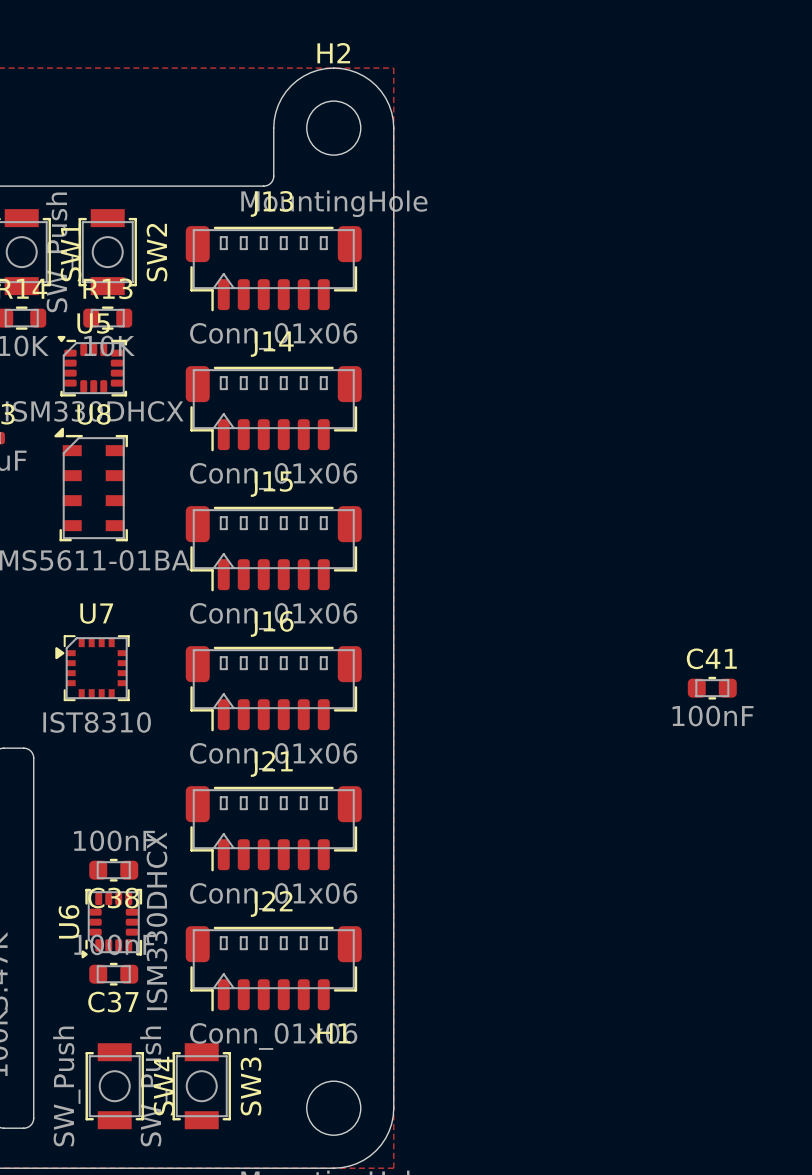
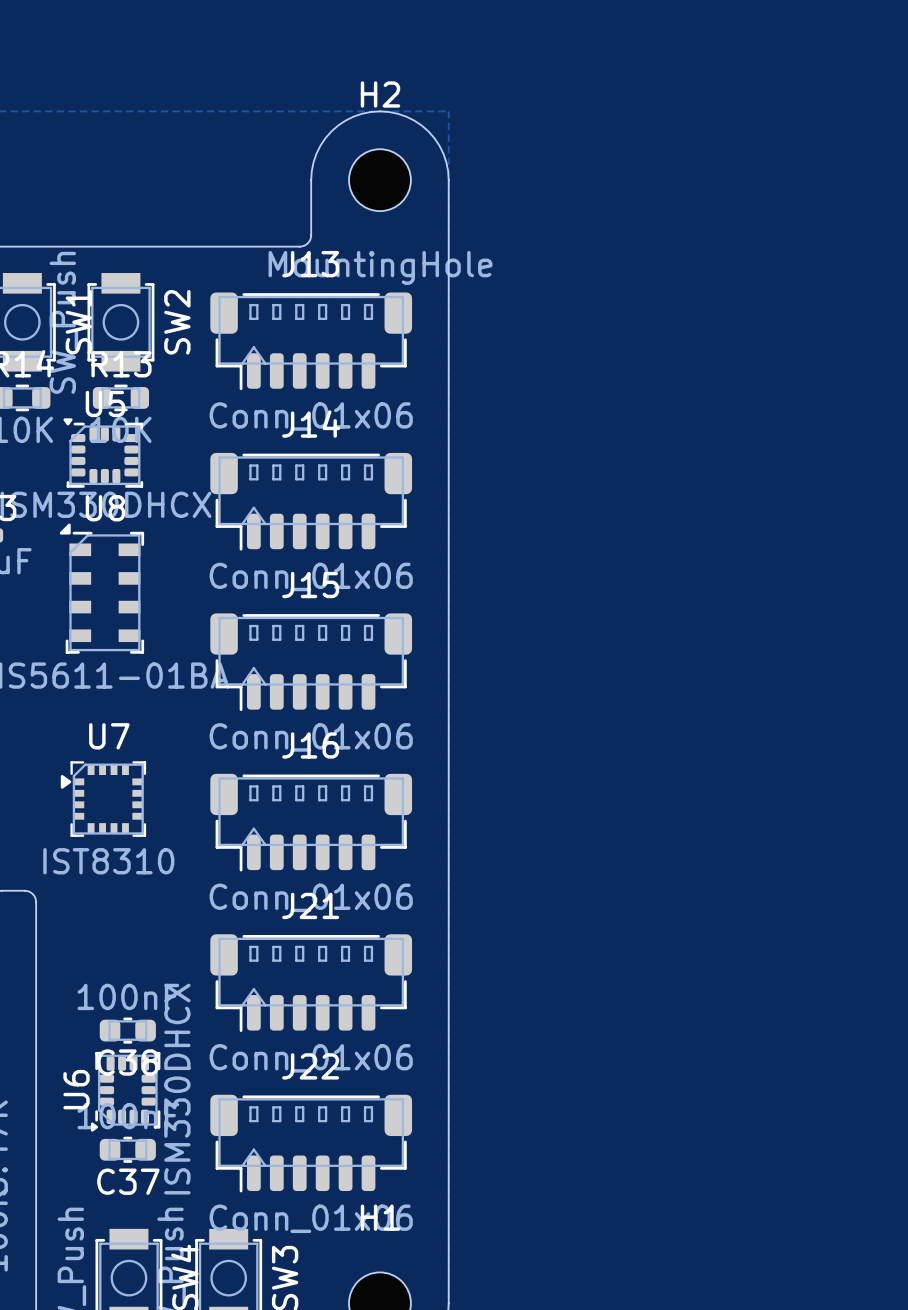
C41: 100nF (712, 688) -> none

